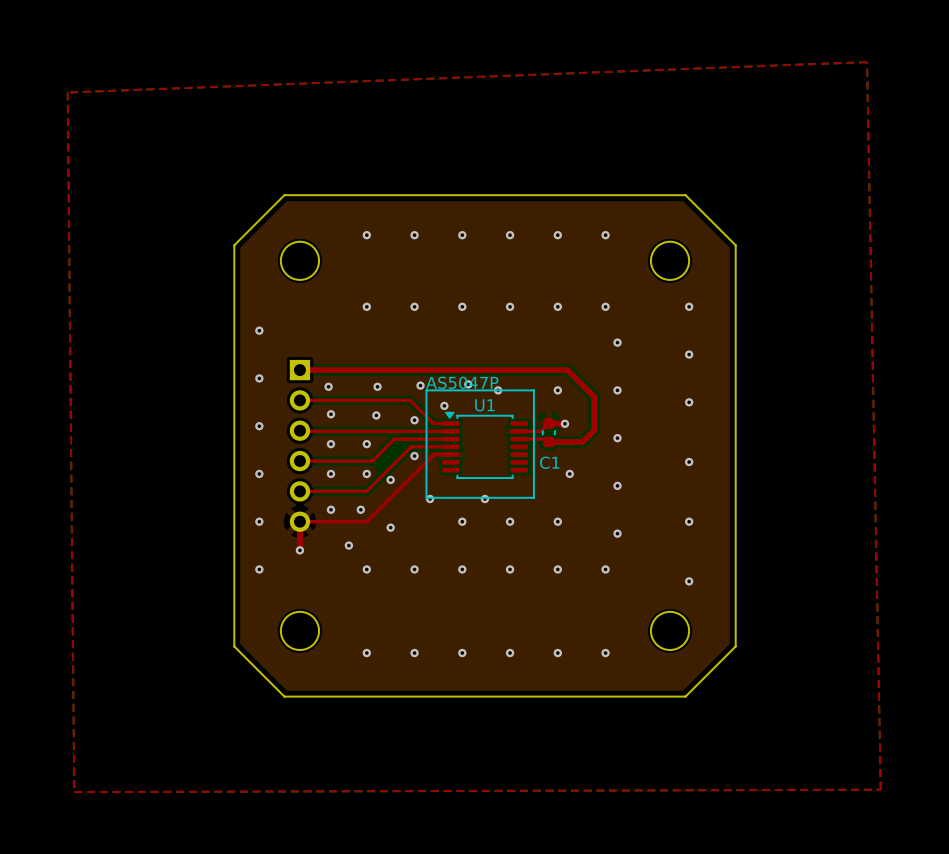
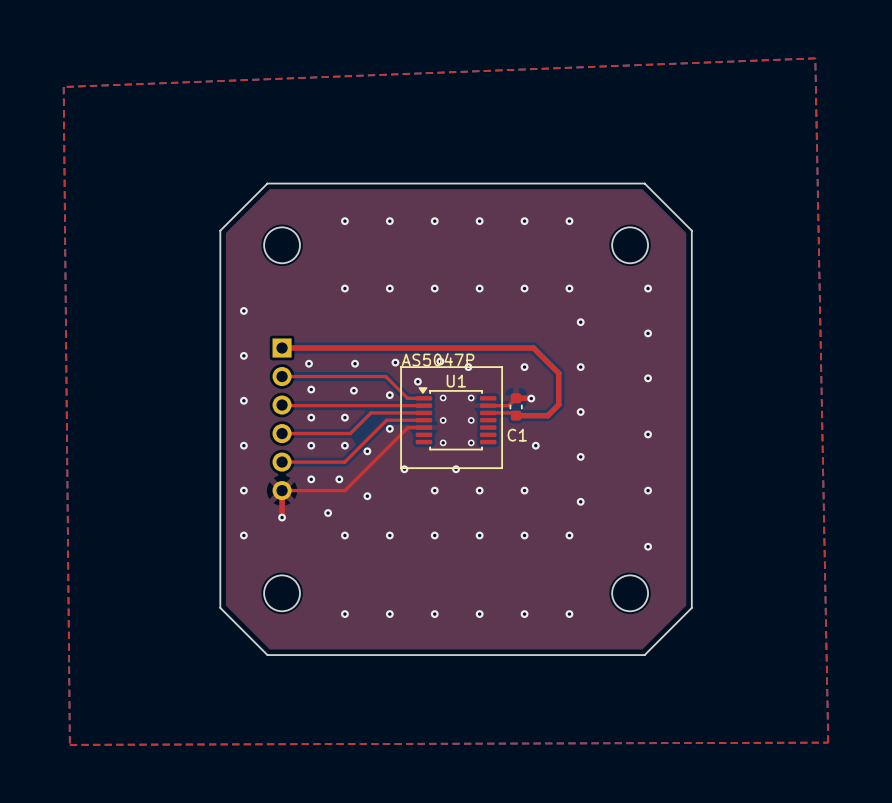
via: none -> (443, 397)
via: none -> (471, 397)
via: none -> (443, 420)
via: none -> (471, 420)
via: none -> (443, 442)
via: none -> (471, 442)

